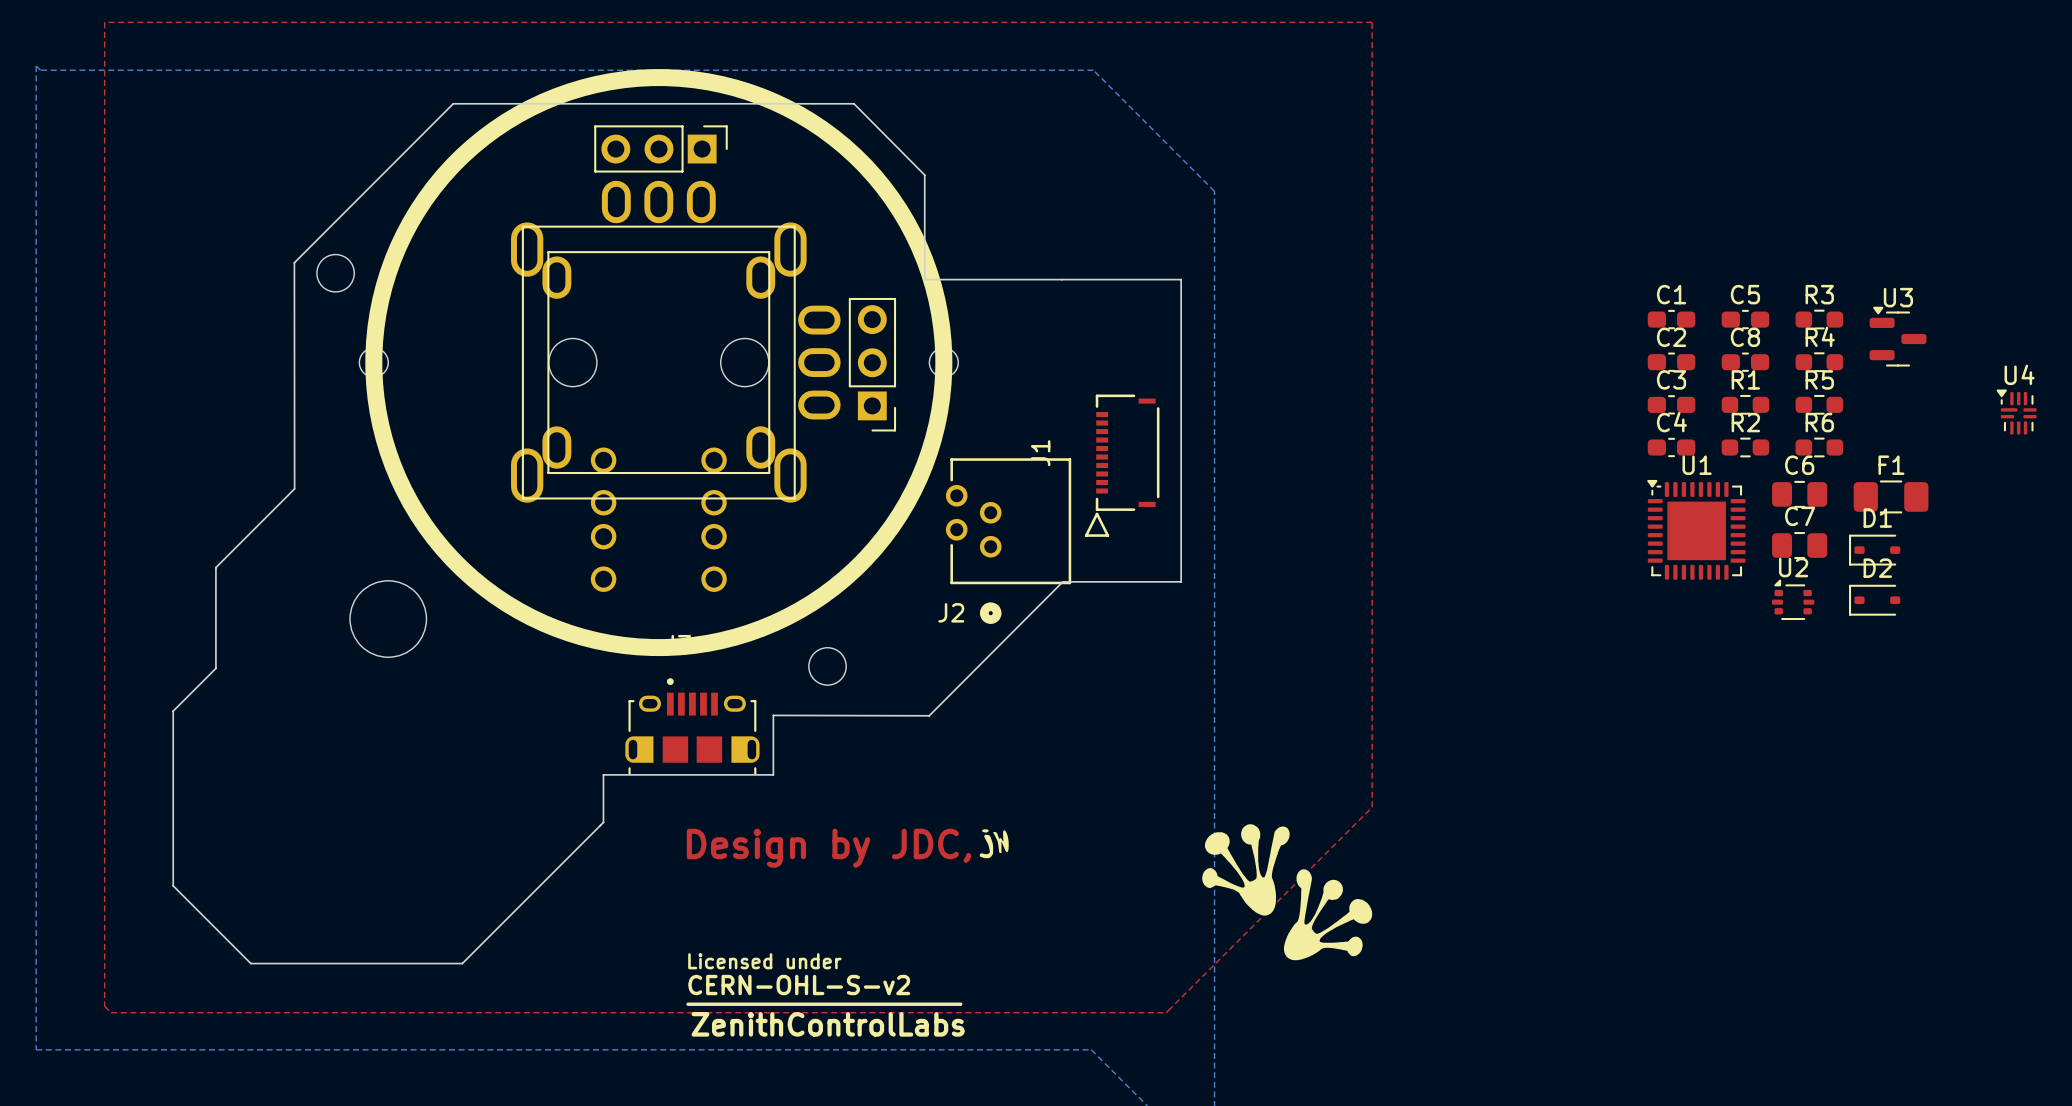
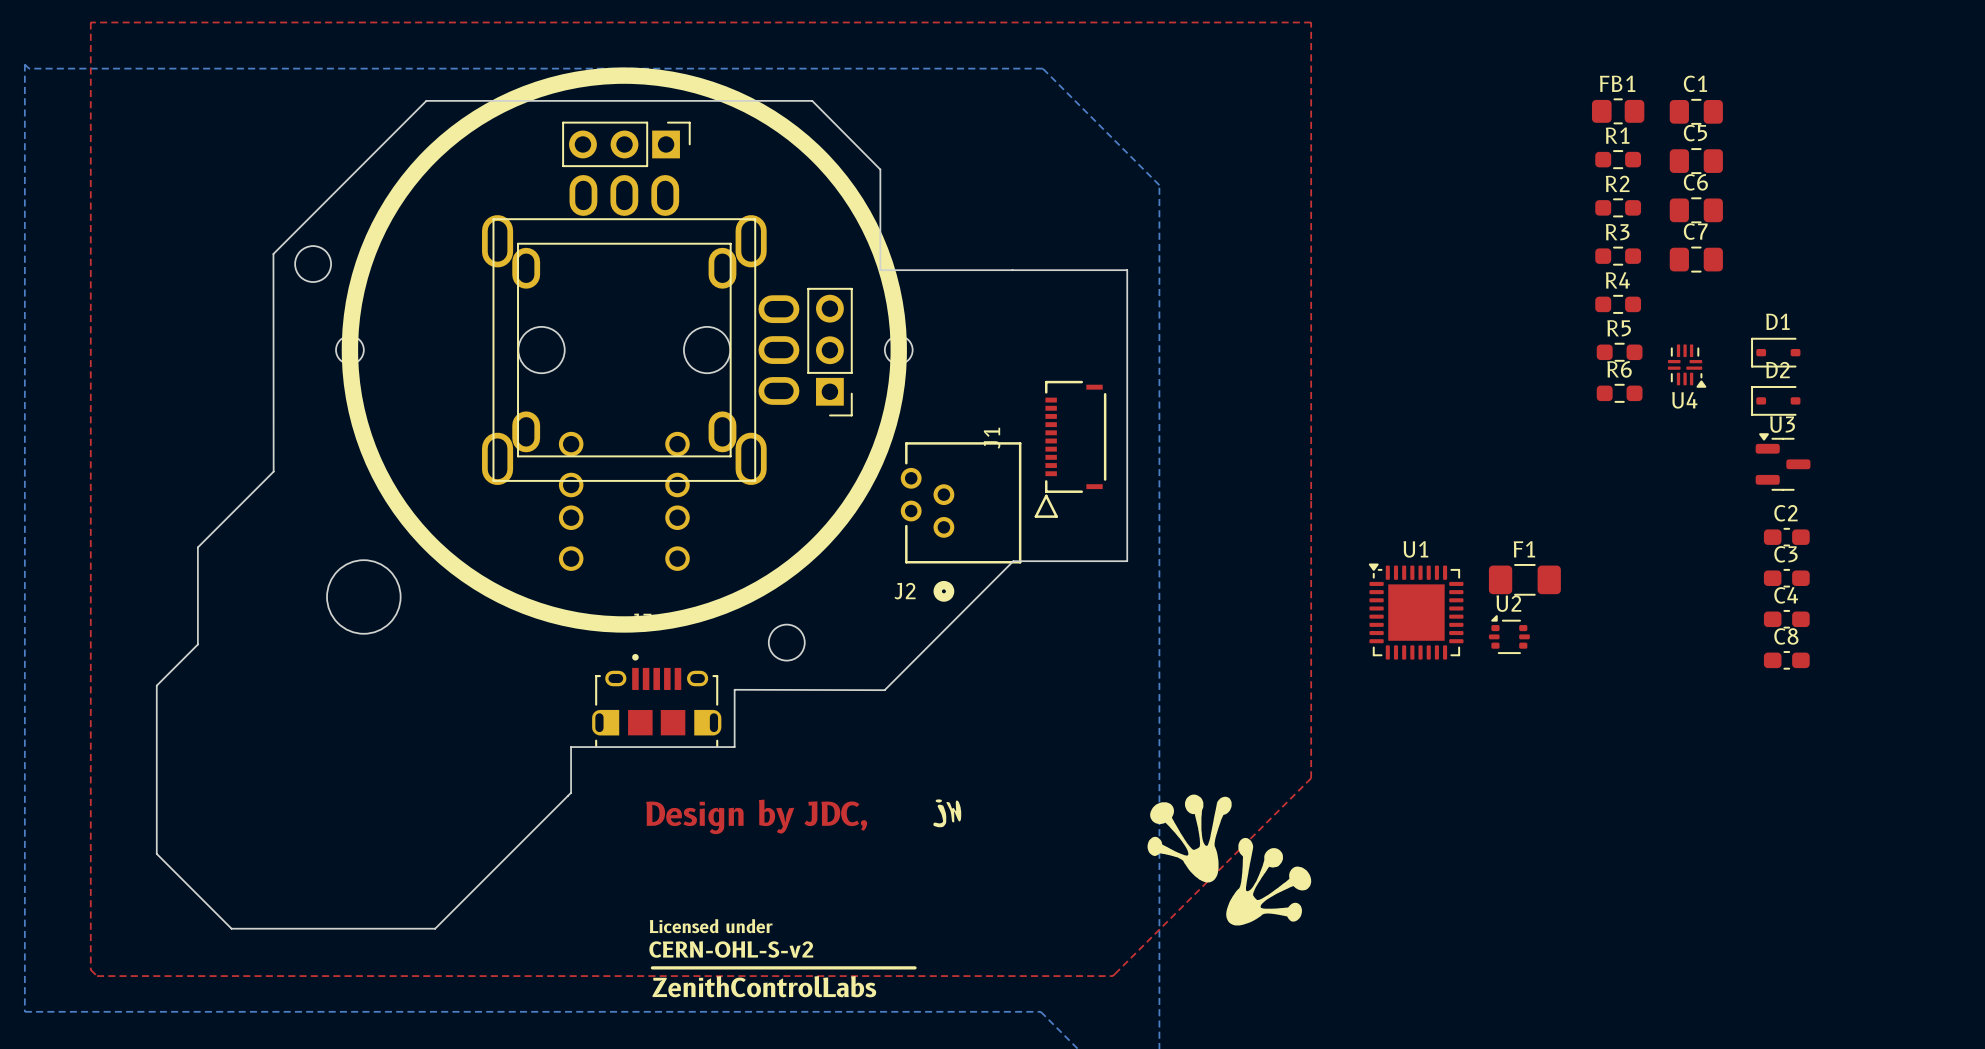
FB1: none -> (1618, 111)
C1 footprint: [1647, 309, 1696, 330] -> [1669, 98, 1723, 125]
C5 footprint: [1721, 309, 1770, 330] -> [1669, 148, 1723, 175]
R3 position: (1819, 319) -> (1618, 256)
U3 position: (1898, 336) -> (1783, 462)
C2 position: (1671, 362) -> (1786, 537)
C8 position: (1745, 362) -> (1786, 660)
R4 position: (1819, 362) -> (1618, 304)
C3 position: (1671, 404) -> (1786, 578)
R1 position: (1745, 404) -> (1618, 159)
R5 position: (1819, 404) -> (1619, 352)
U4 rotation: 0° (2016, 412) -> 180° (1687, 366)
U4 position: (2016, 412) -> (1687, 366)
C4 position: (1671, 447) -> (1786, 619)
R2 position: (1745, 447) -> (1618, 207)
R6 position: (1819, 447) -> (1619, 393)
C6 position: (1799, 494) -> (1696, 210)
F1 position: (1891, 496) -> (1524, 579)
U1 position: (1696, 529) -> (1416, 611)
C7 position: (1799, 545) -> (1696, 259)
D1 position: (1874, 550) -> (1775, 352)
U2 position: (1793, 599) -> (1509, 634)
D2 position: (1874, 600) -> (1775, 400)

